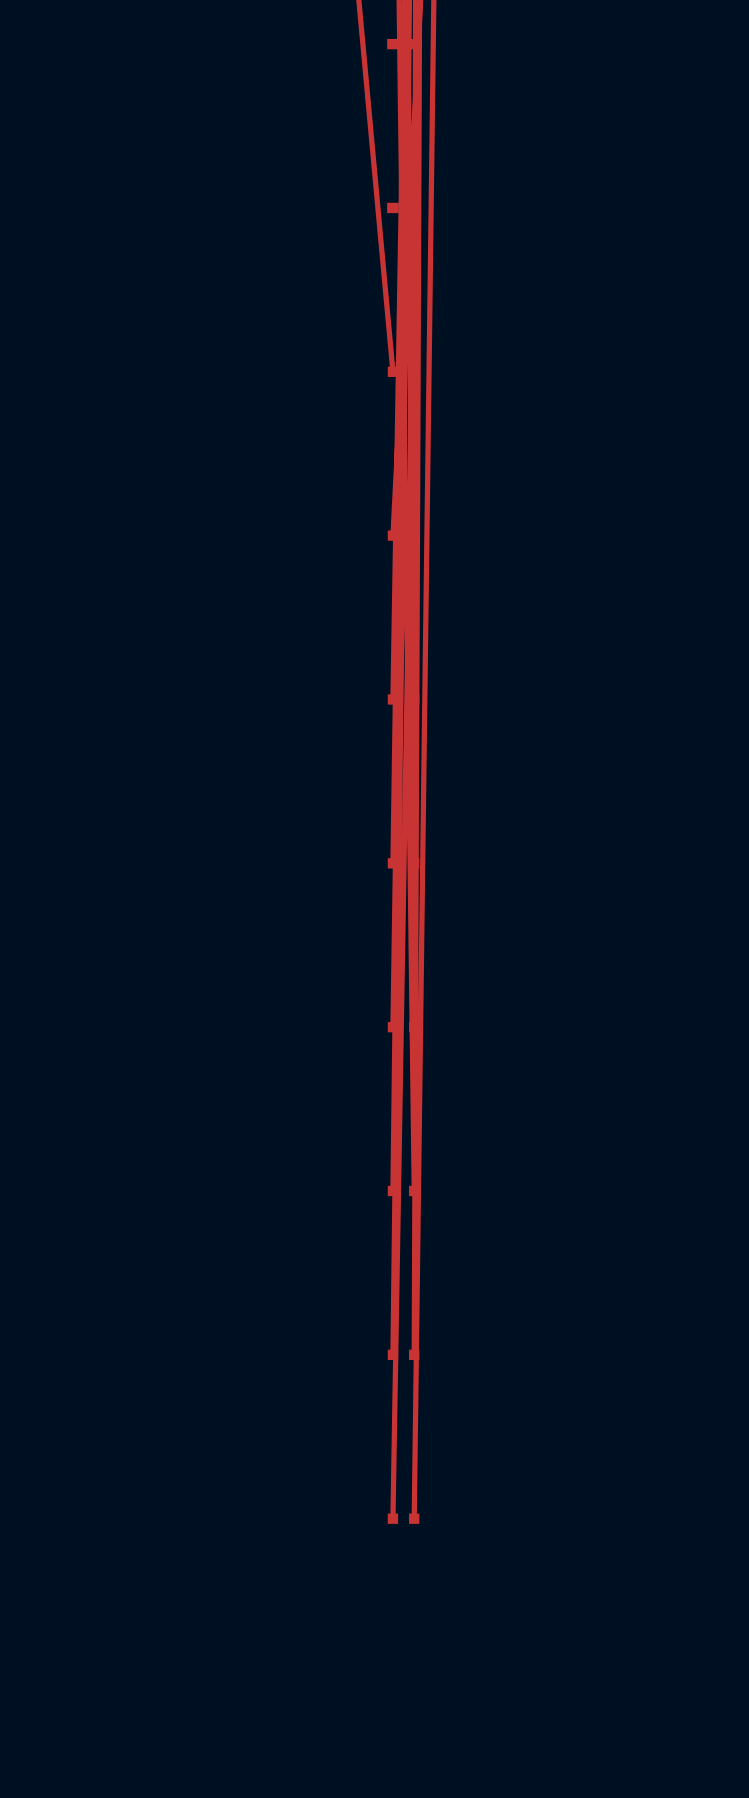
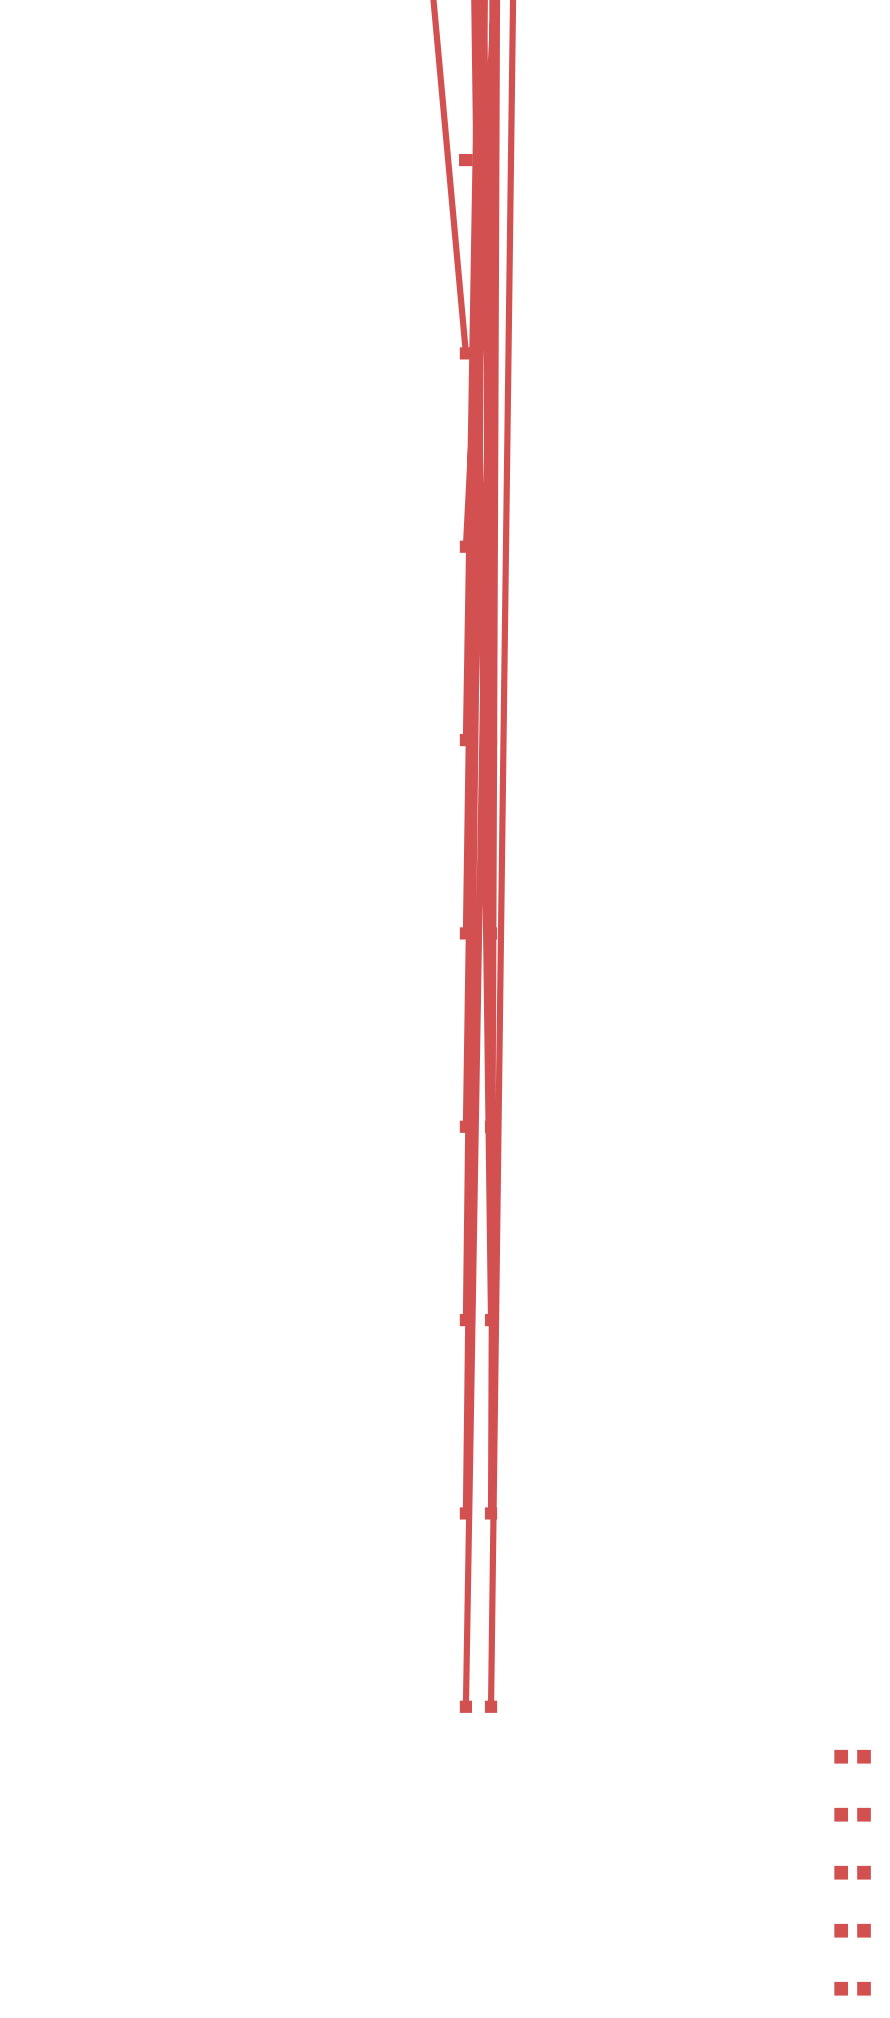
part: none -> (852, 1756)
part: none -> (852, 1814)
part: none -> (852, 1872)
part: none -> (852, 1930)
part: none -> (852, 1988)

